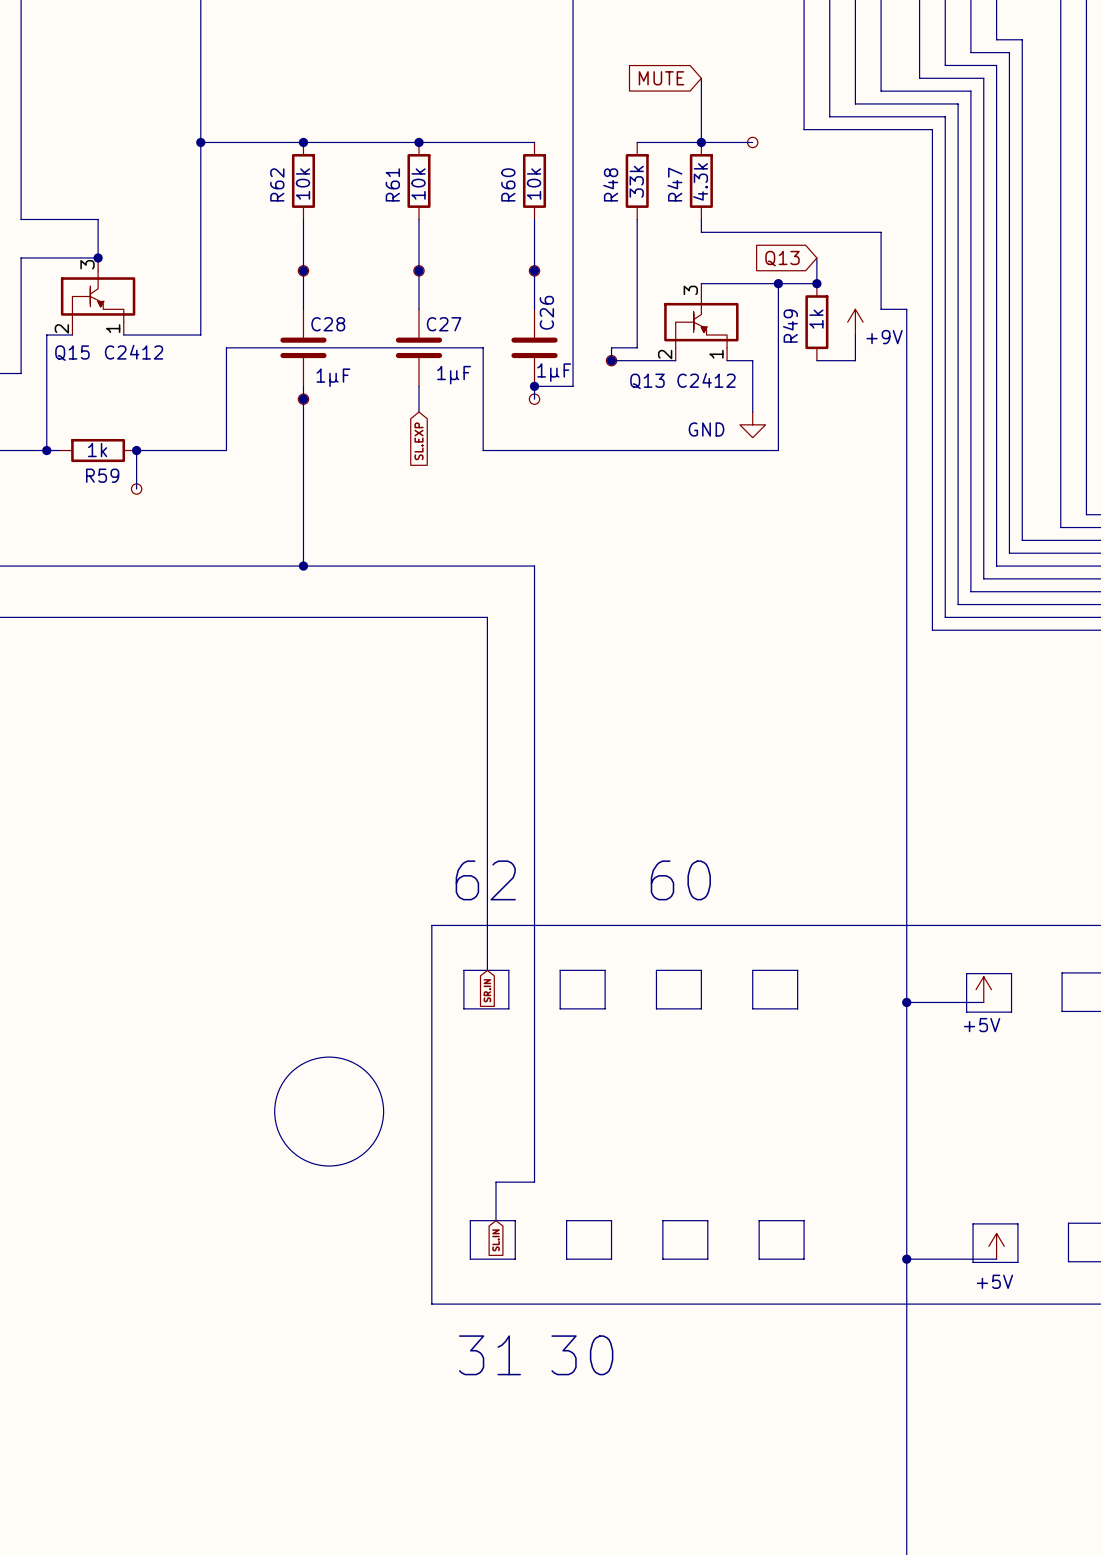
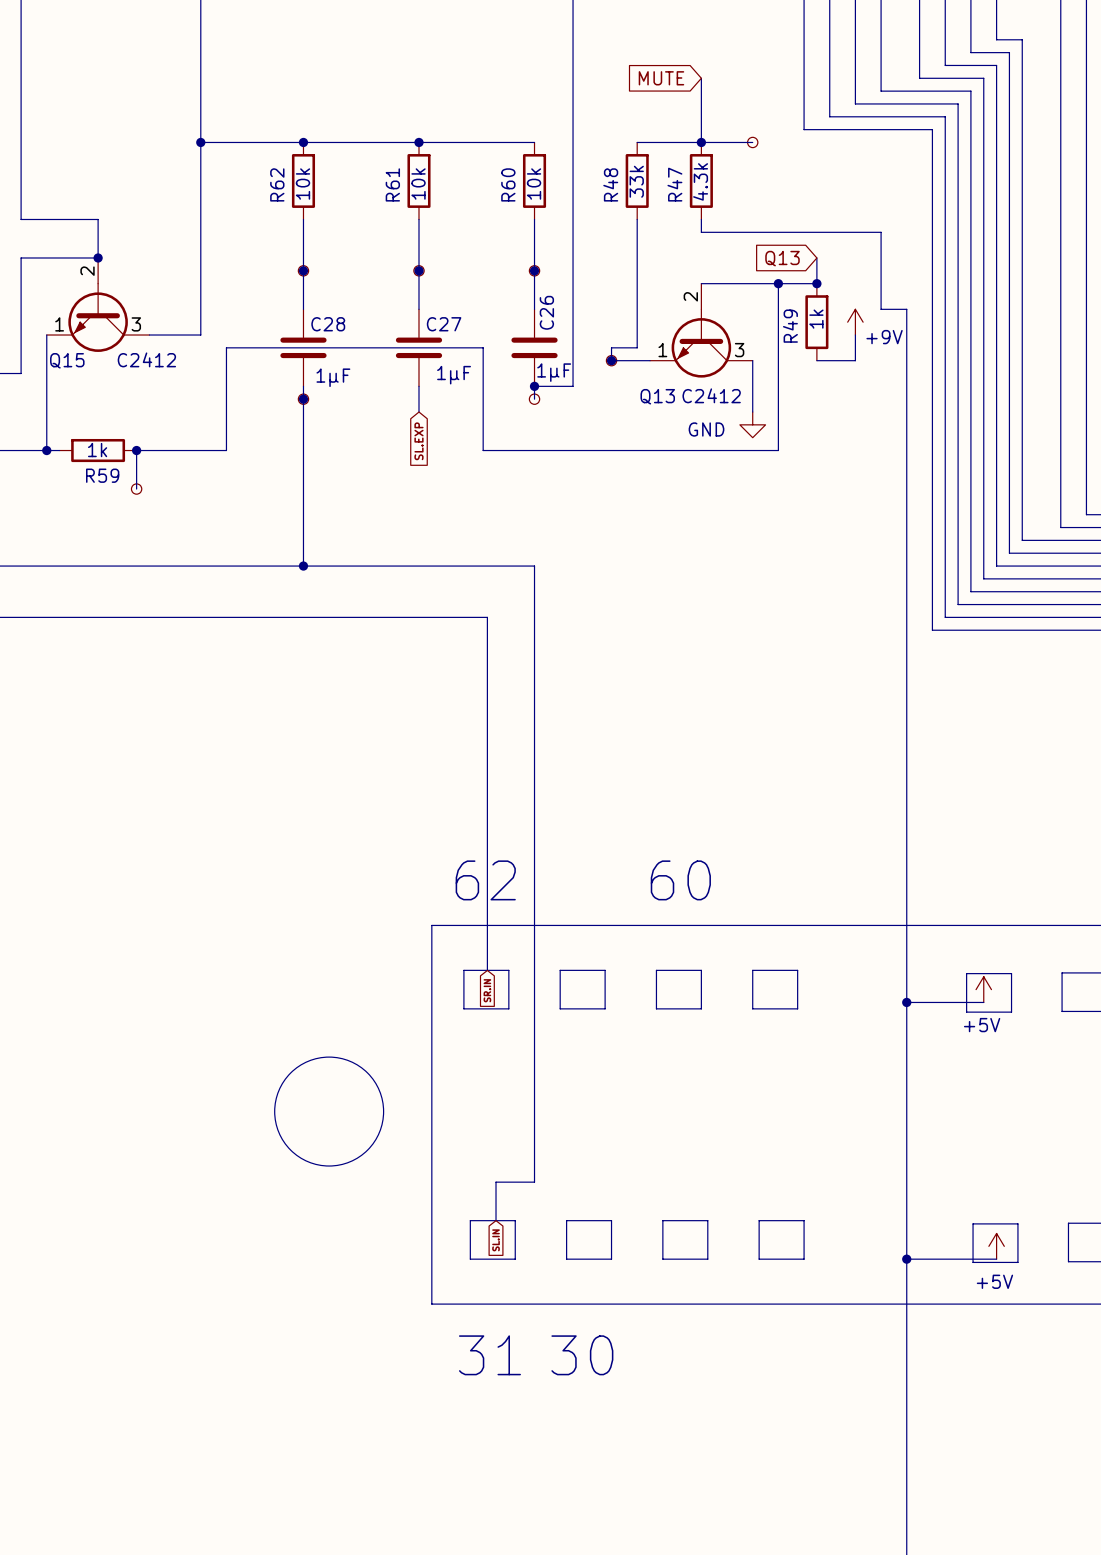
Q15 symbol: [60, 257, 136, 336] -> [46, 257, 150, 352]
Q13 symbol: [664, 283, 739, 361] -> [650, 283, 753, 378]

